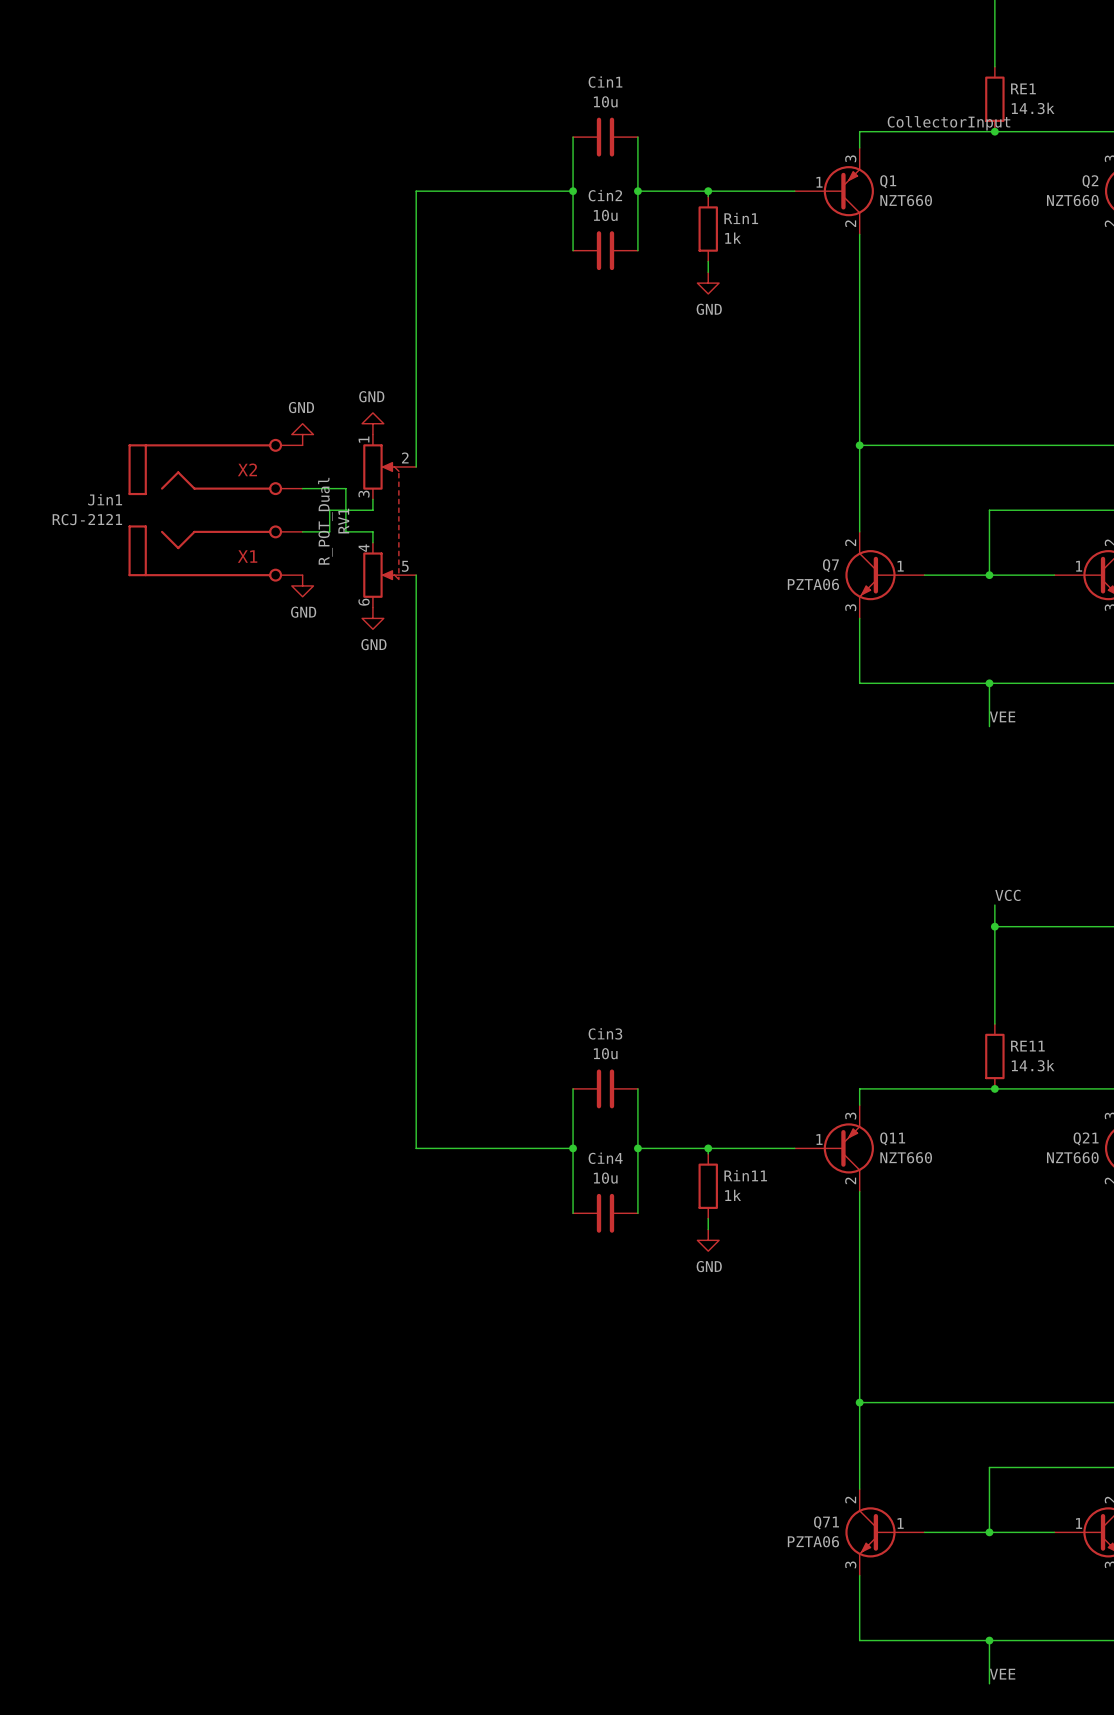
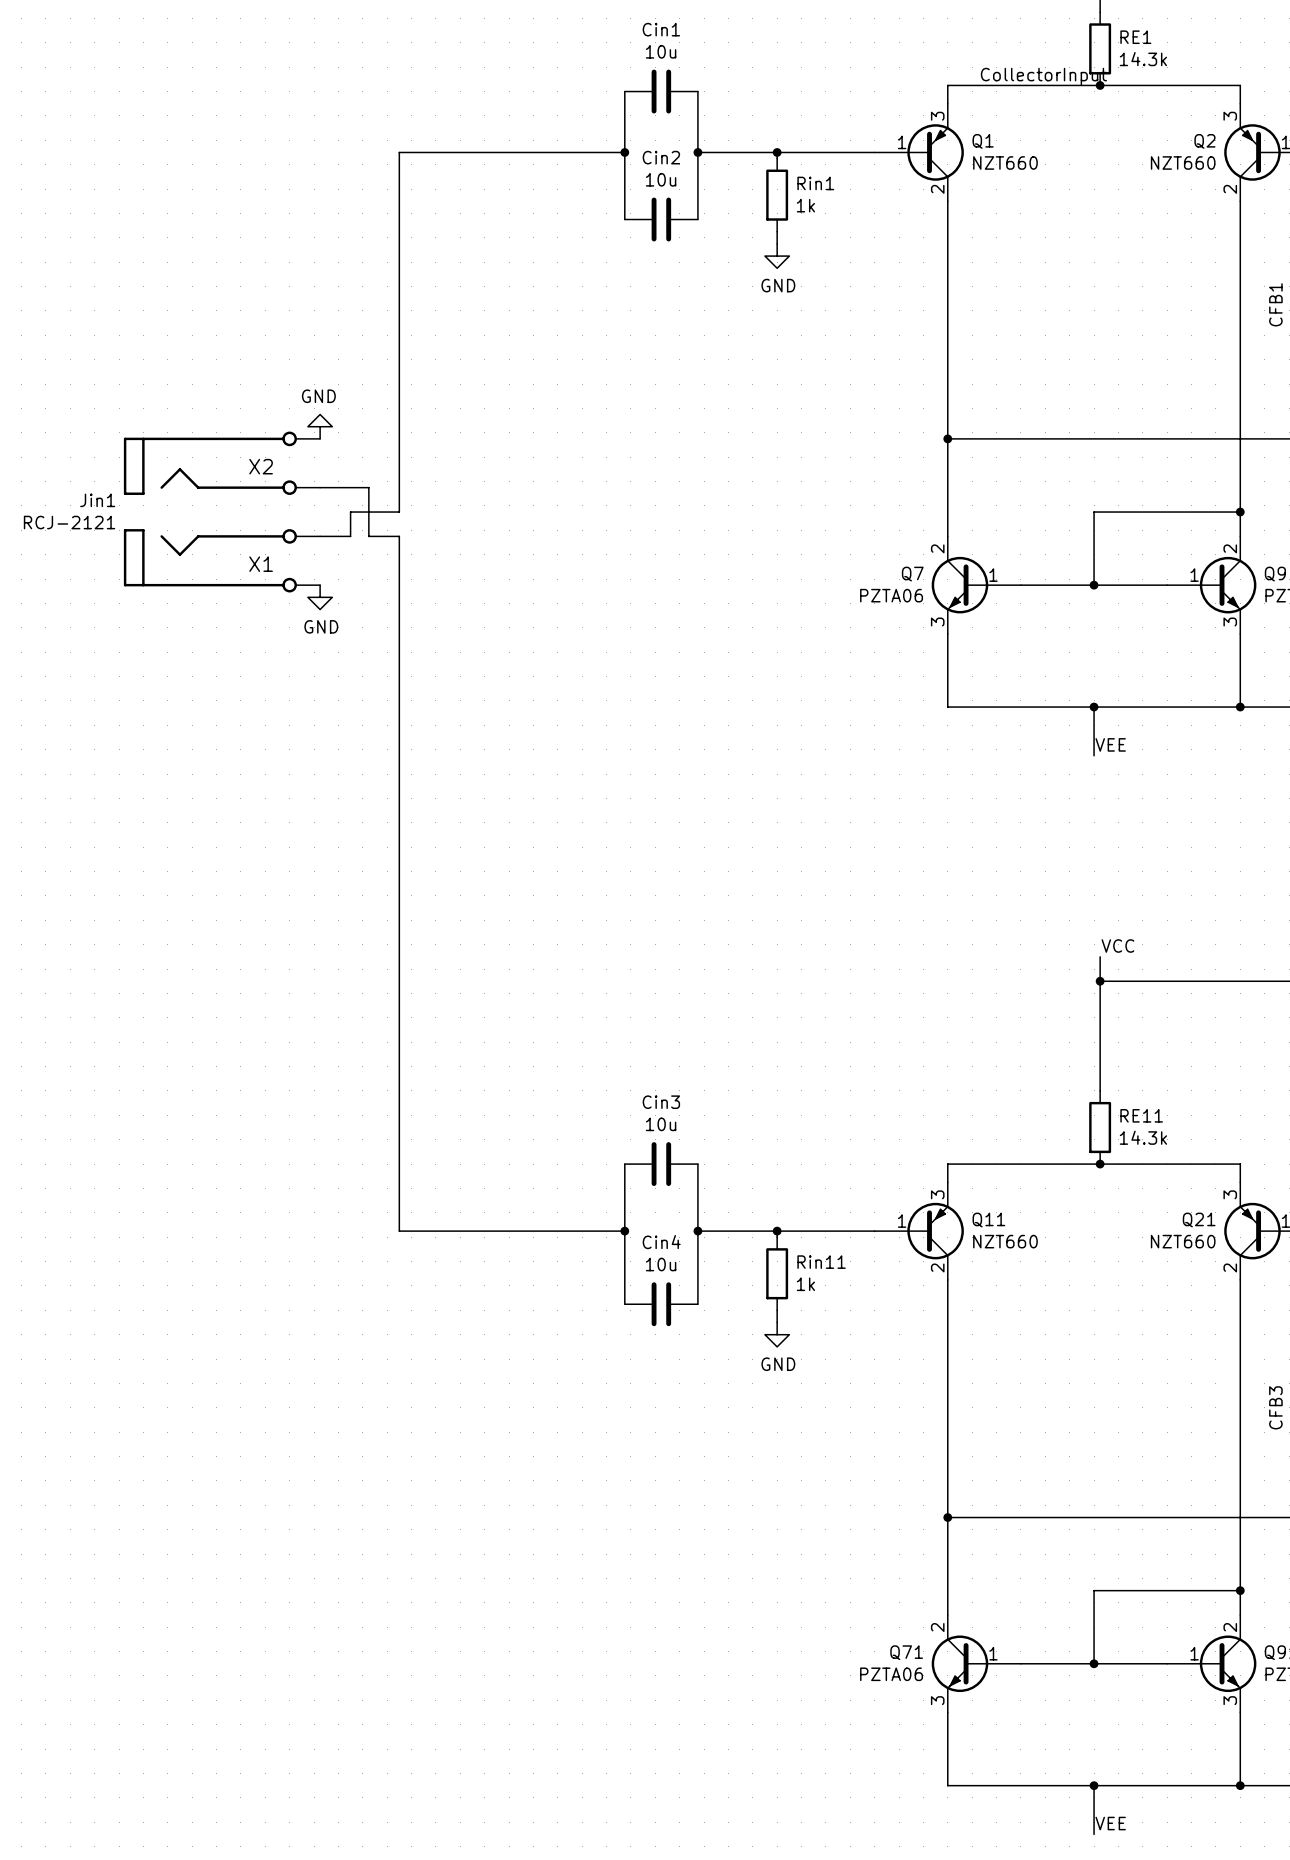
wire: (416, 191) (416, 466) -> (448, 152) (399, 152) (399, 499)
power symbol: GND (372, 423) -> none
RV1: R_POT_Dual (389, 521) -> none
wire: (416, 575) (416, 1148) -> (399, 548) (399, 1231) (448, 1231)
power symbol: GND (372, 618) -> none

